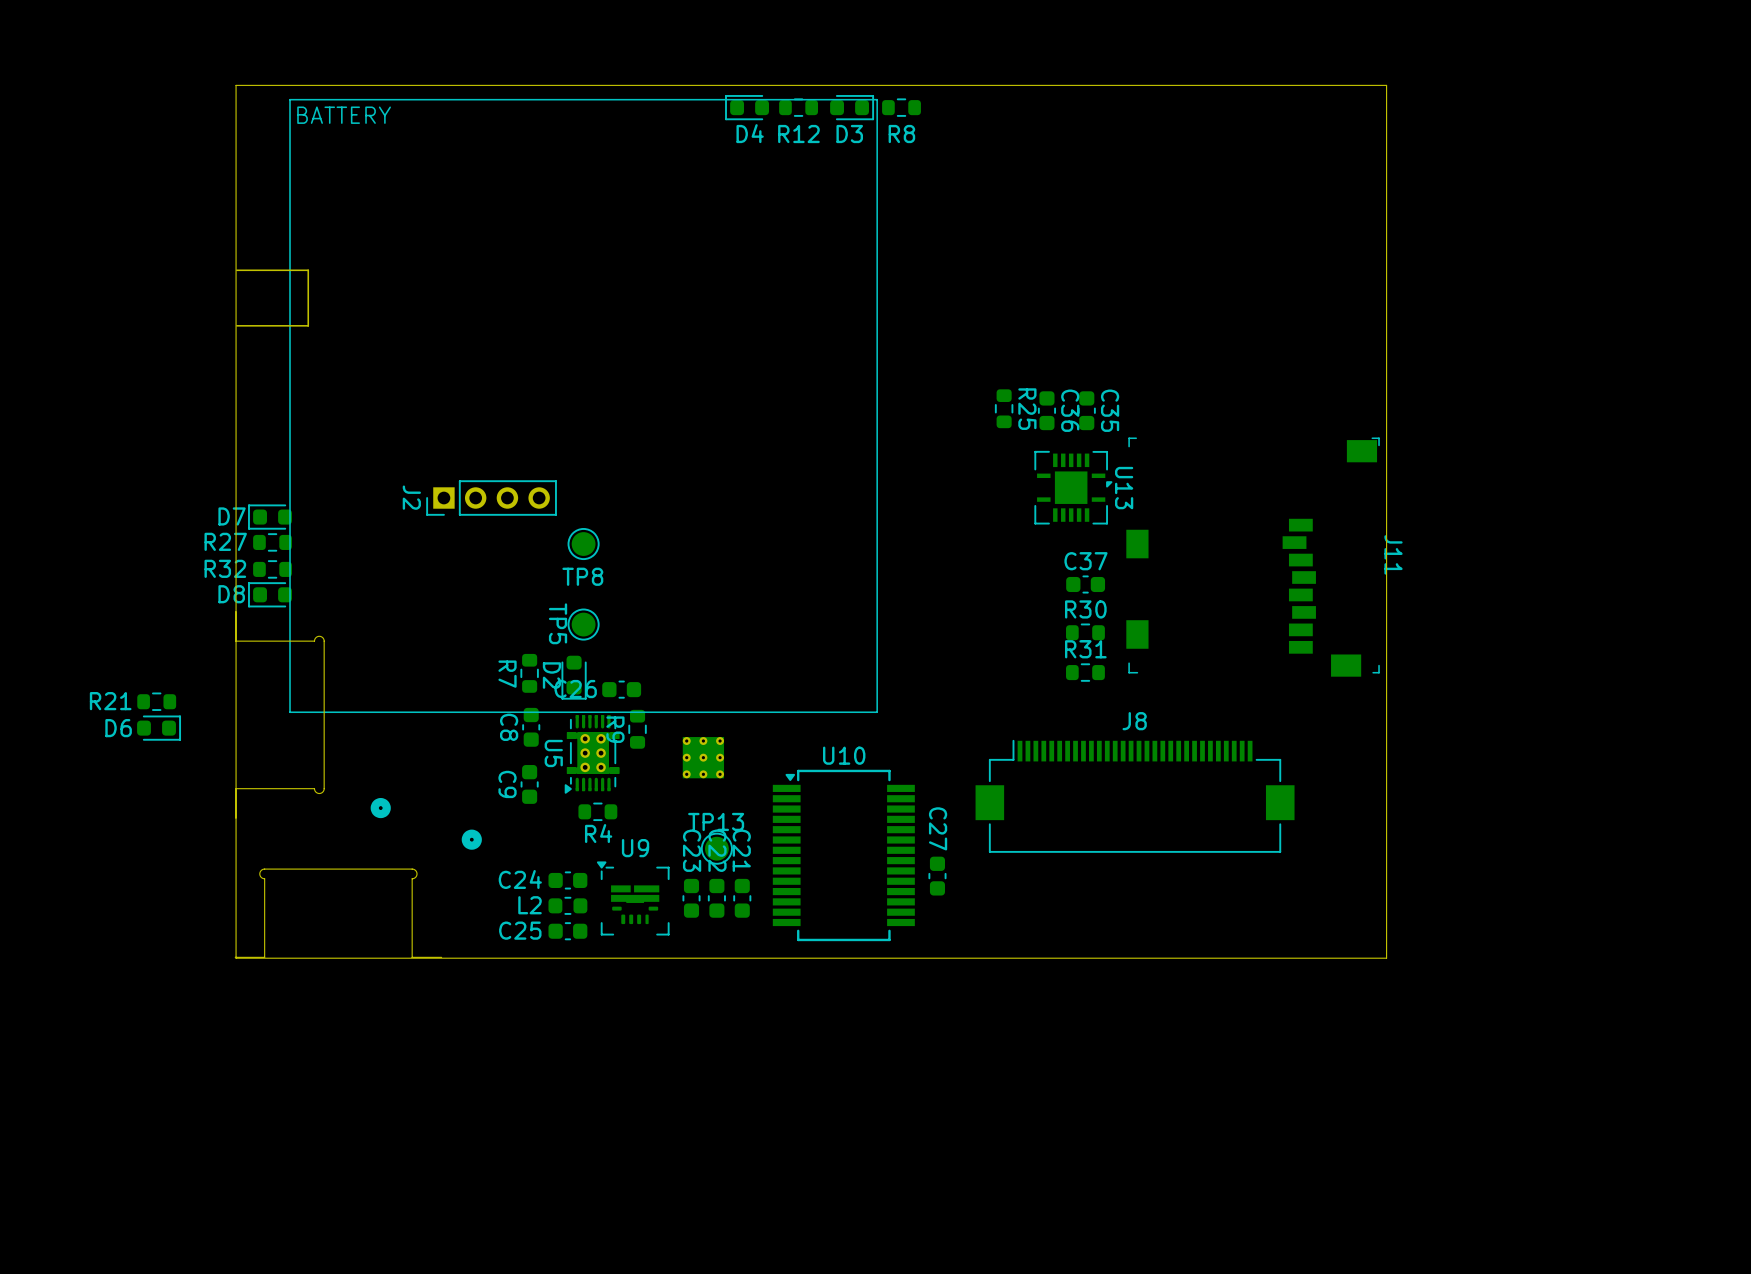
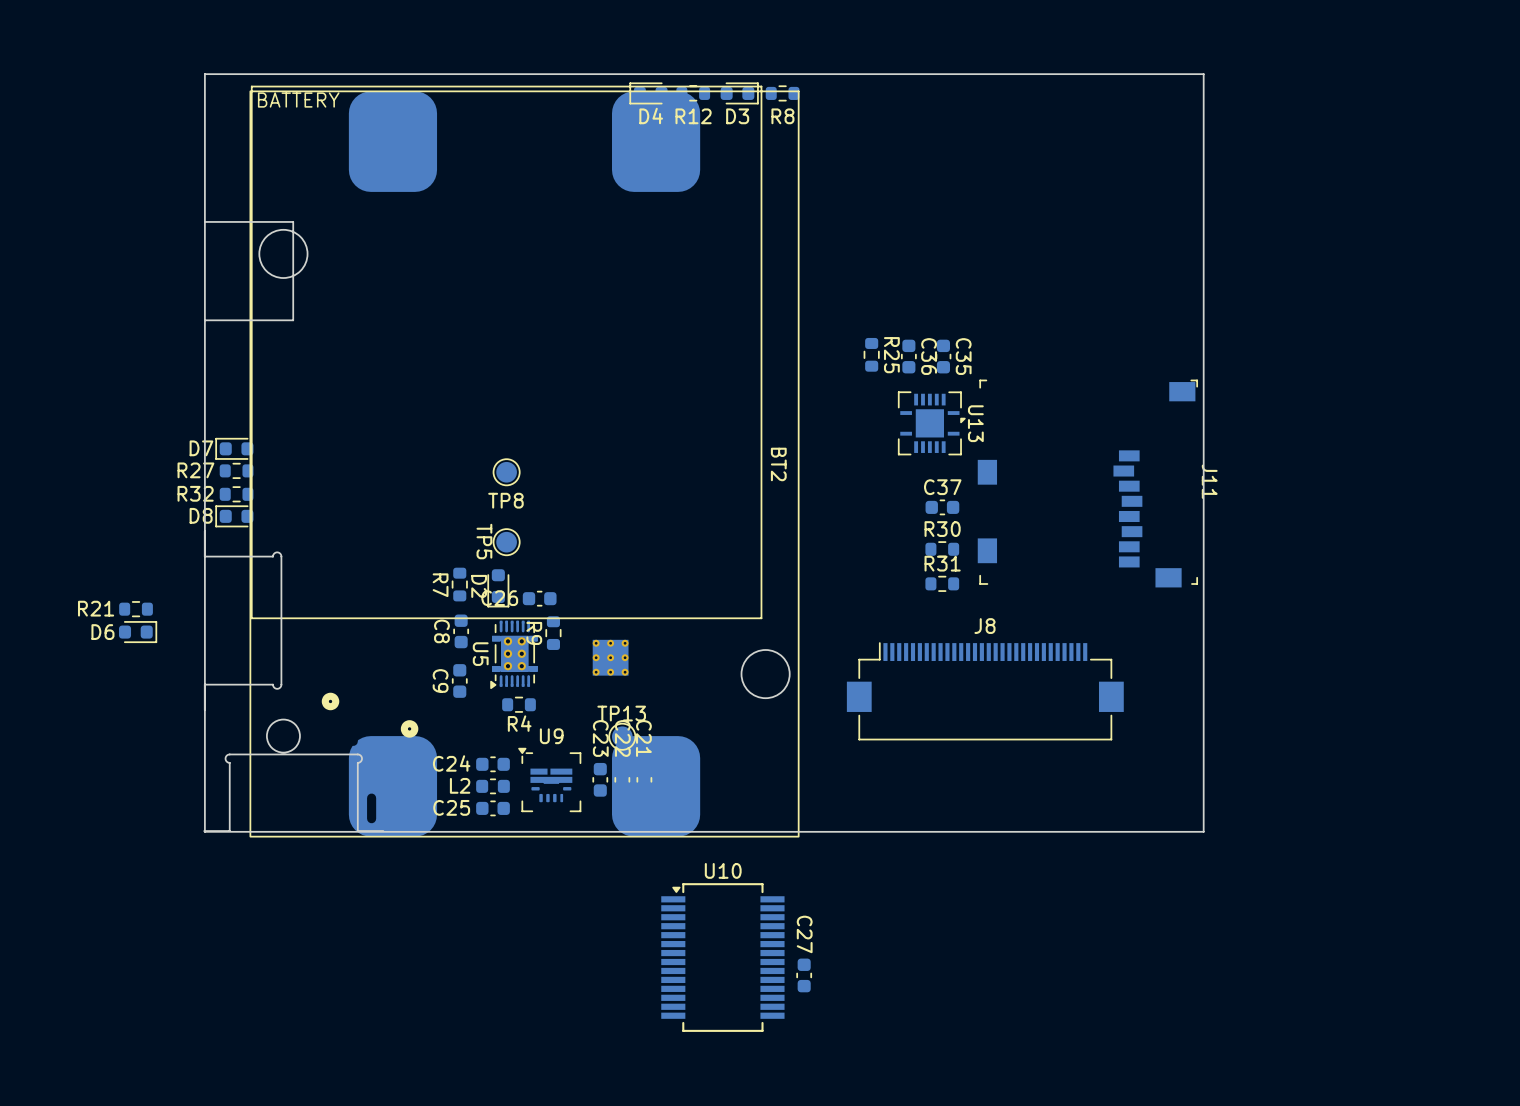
part: (272, 298) -> none
part: none -> (249, 271)
J2: (491, 498) -> none
BT2: none -> (524, 464)
U10 position: (843, 855) -> (722, 957)
C27 position: (937, 876) -> (804, 975)

